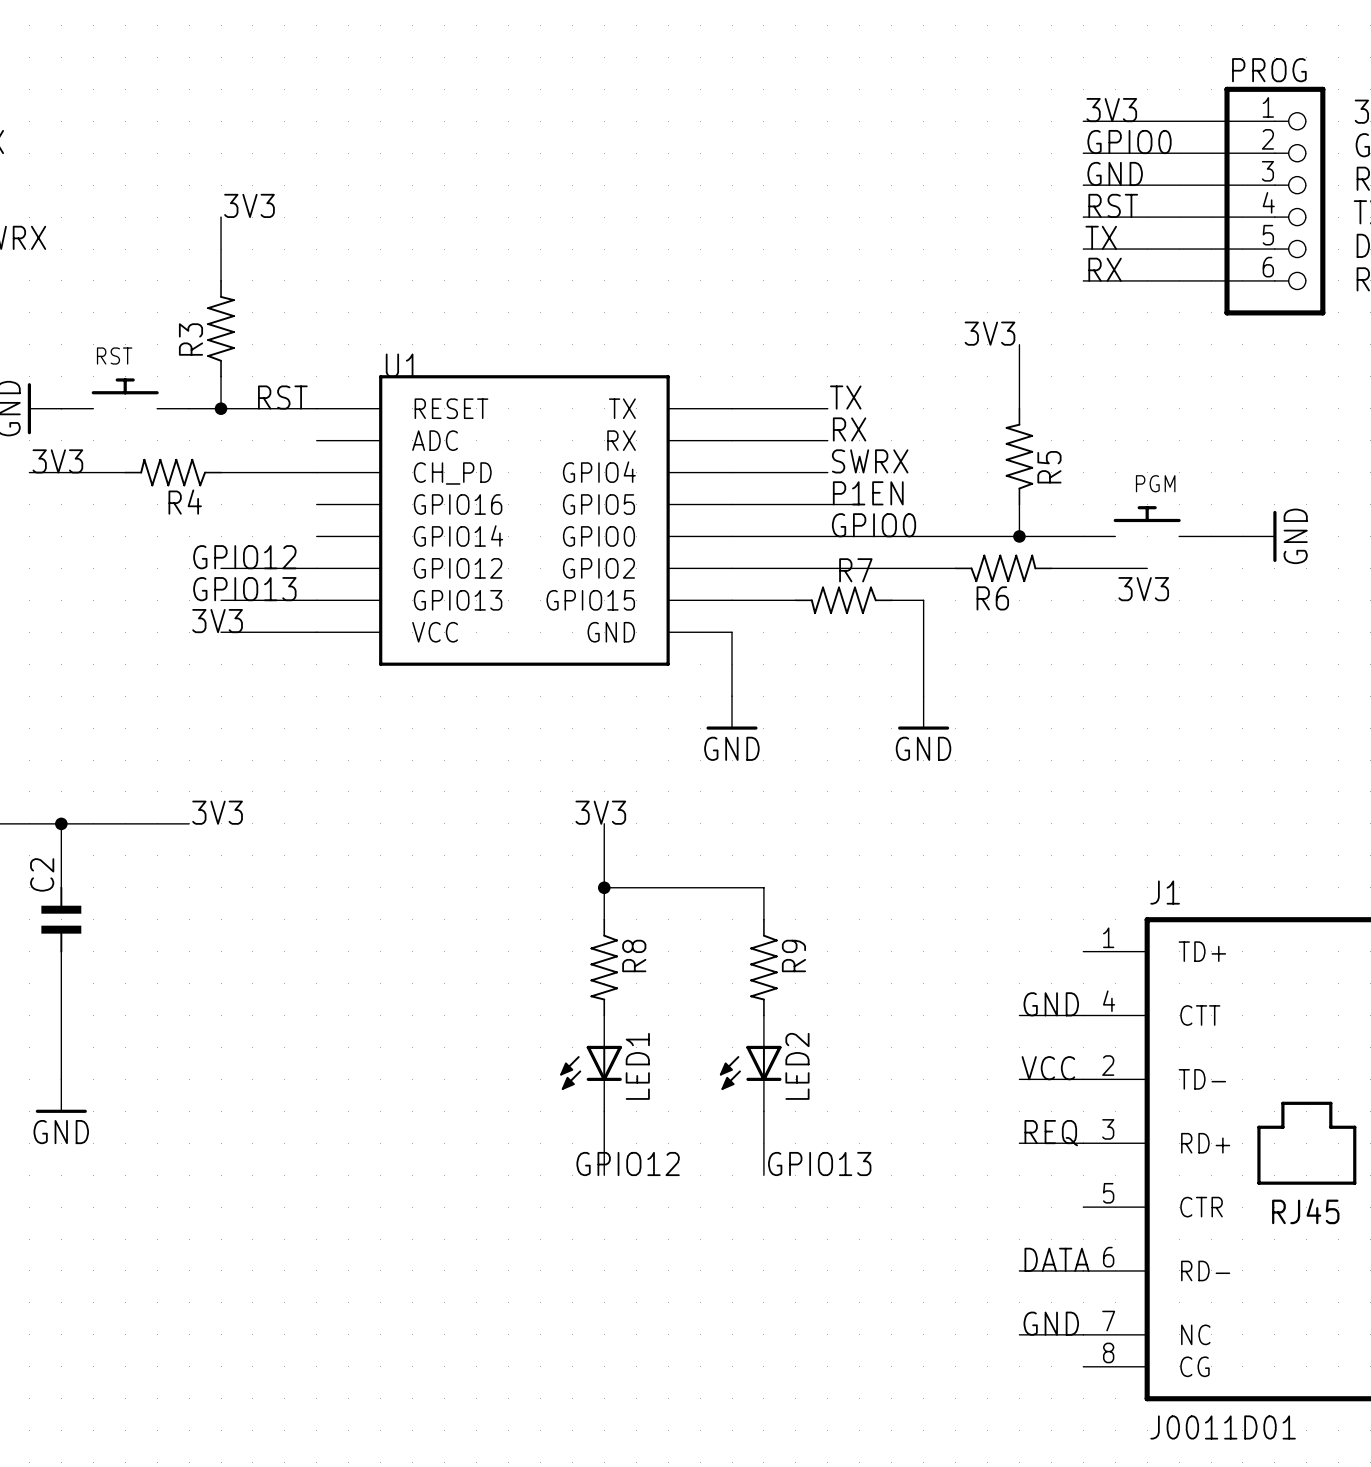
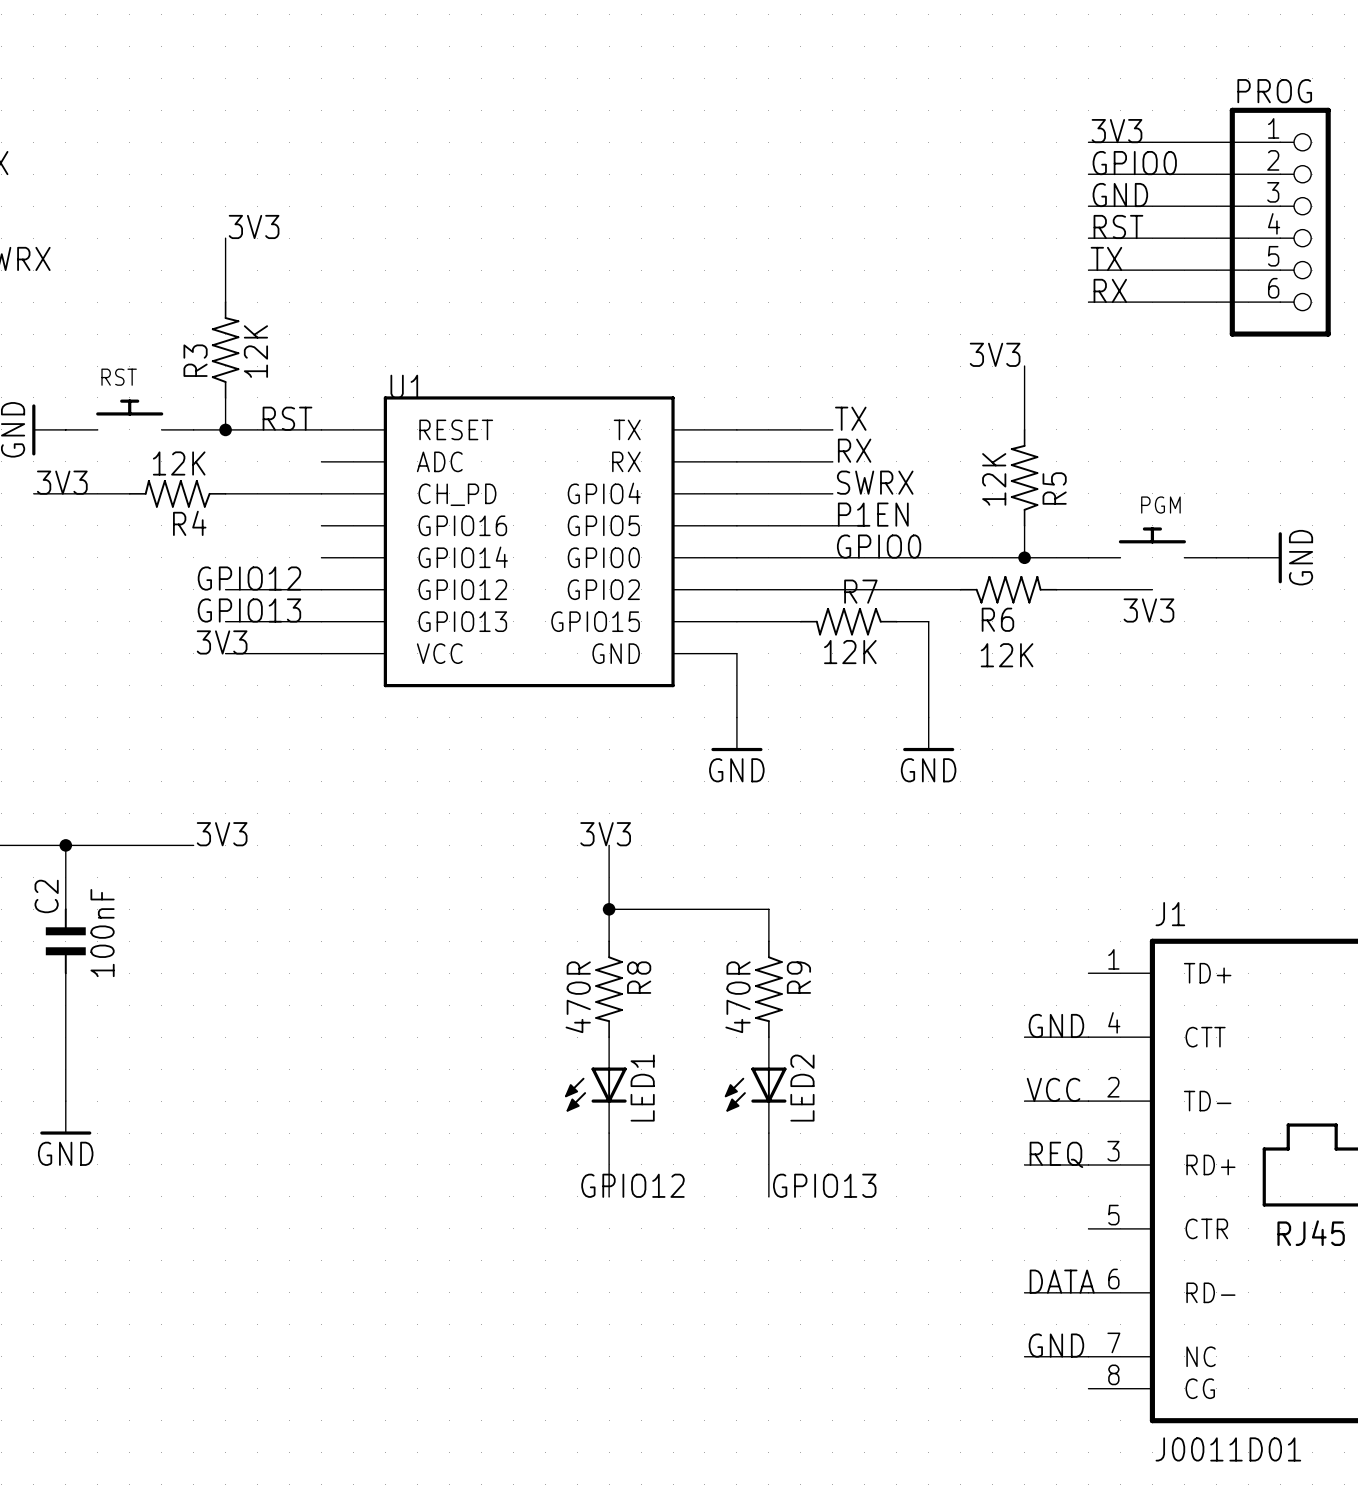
R3 value: none -> 12K (255, 351)
R4 value: none -> 12K (179, 463)
R5 value: none -> 12K (994, 479)
R7 value: none -> 12K (850, 652)
R6 value: none -> 12K (1007, 655)
C2 value: none -> 100nF (102, 933)
R8 value: none -> 470R (578, 997)
R9 value: none -> 470R (738, 997)

